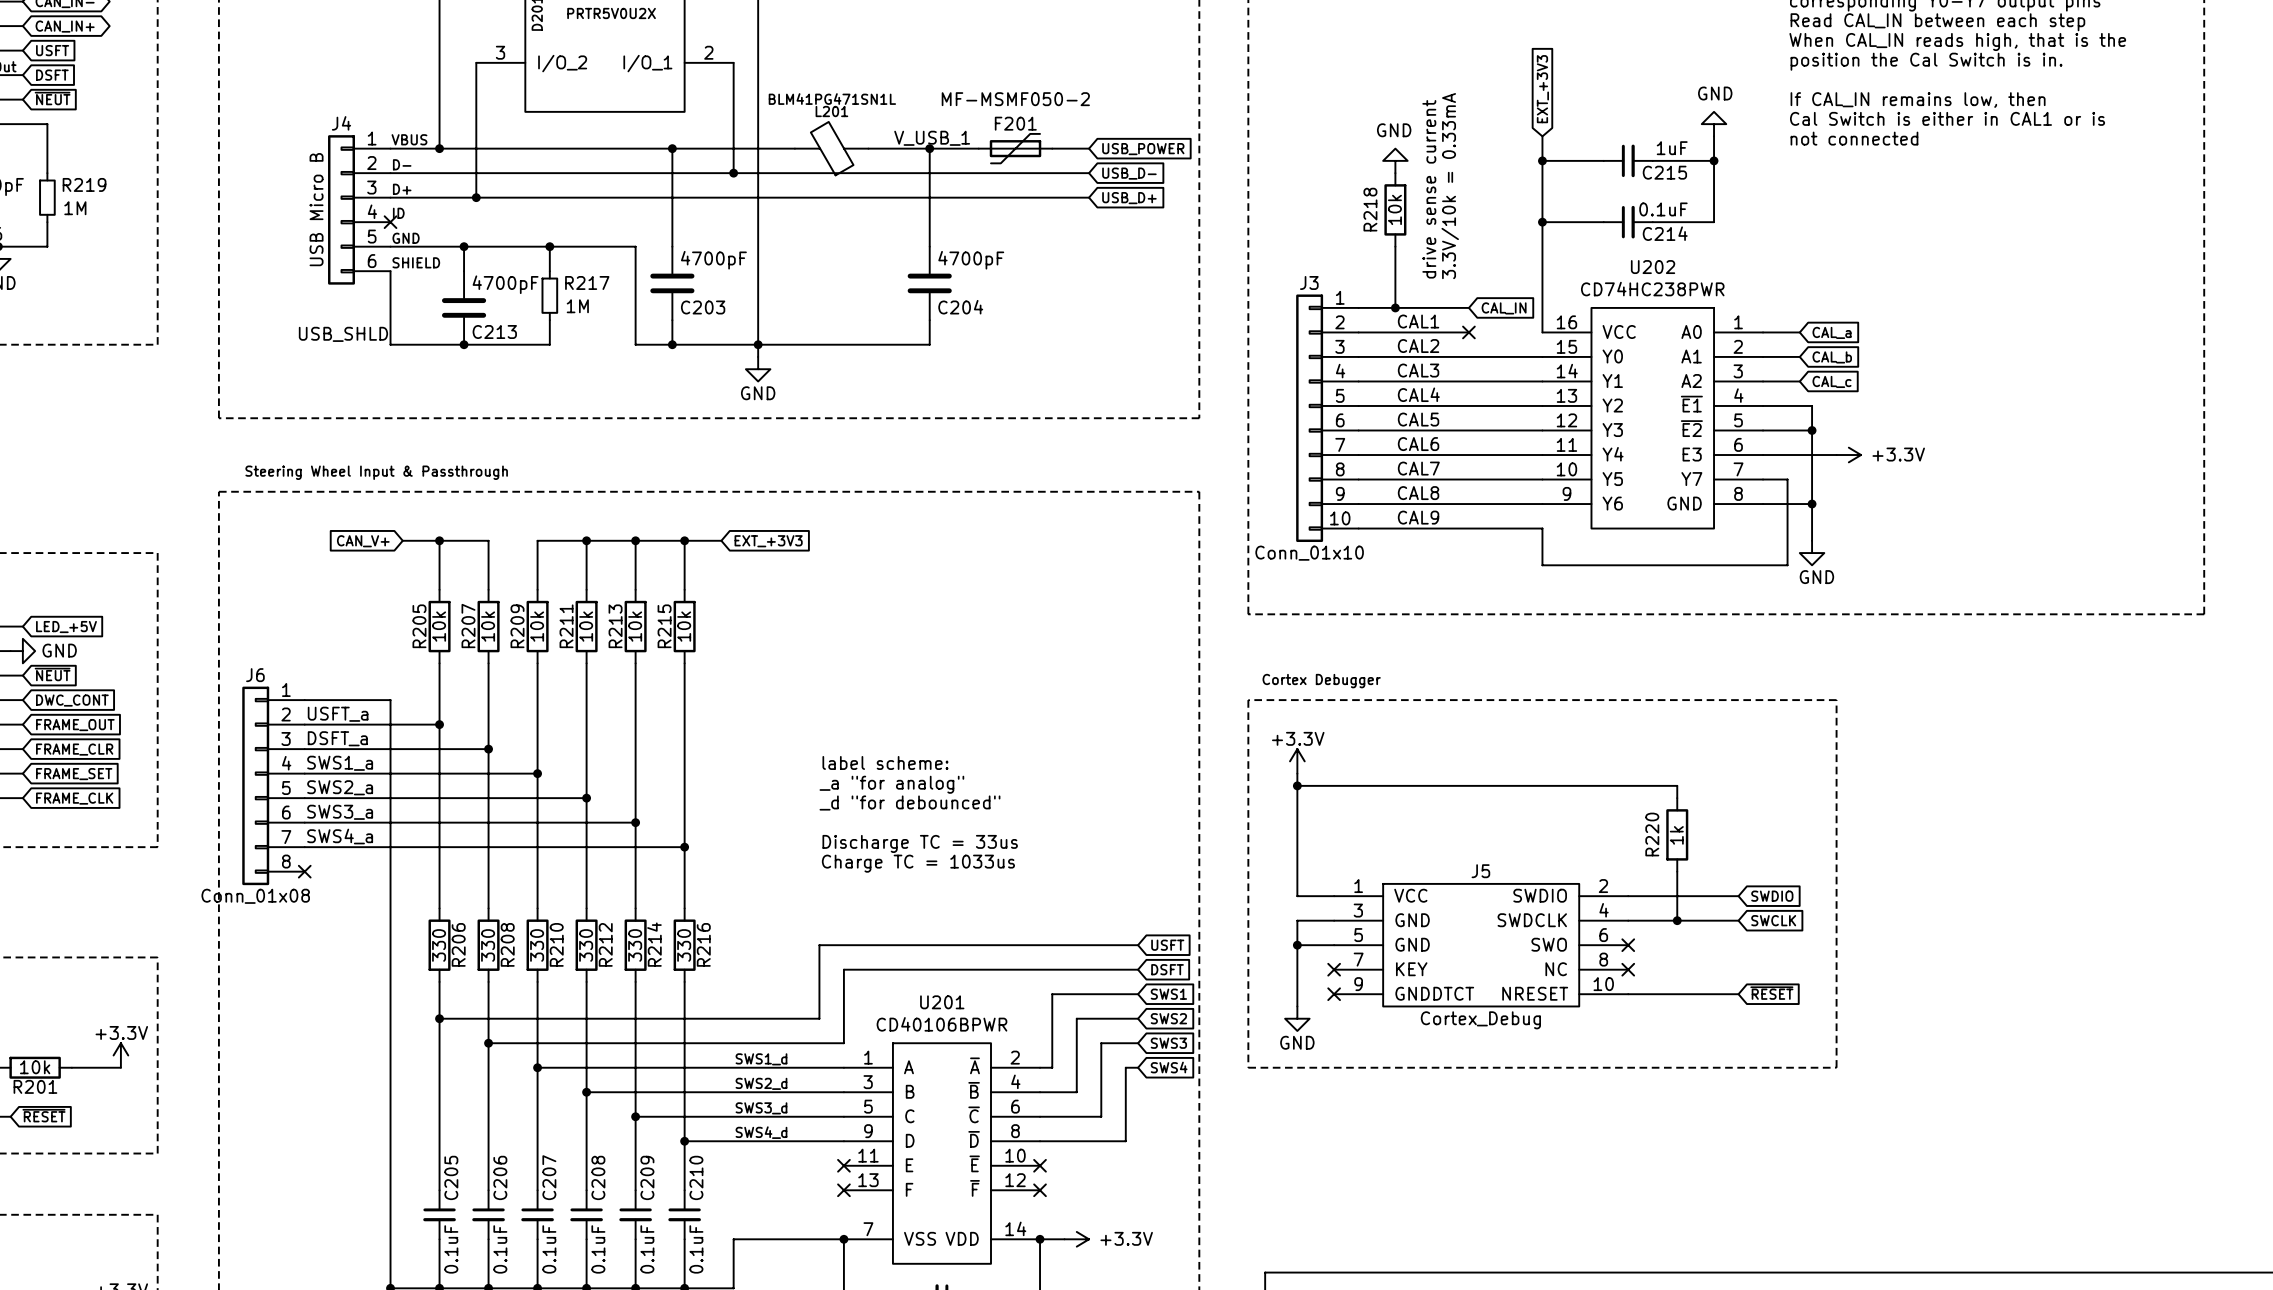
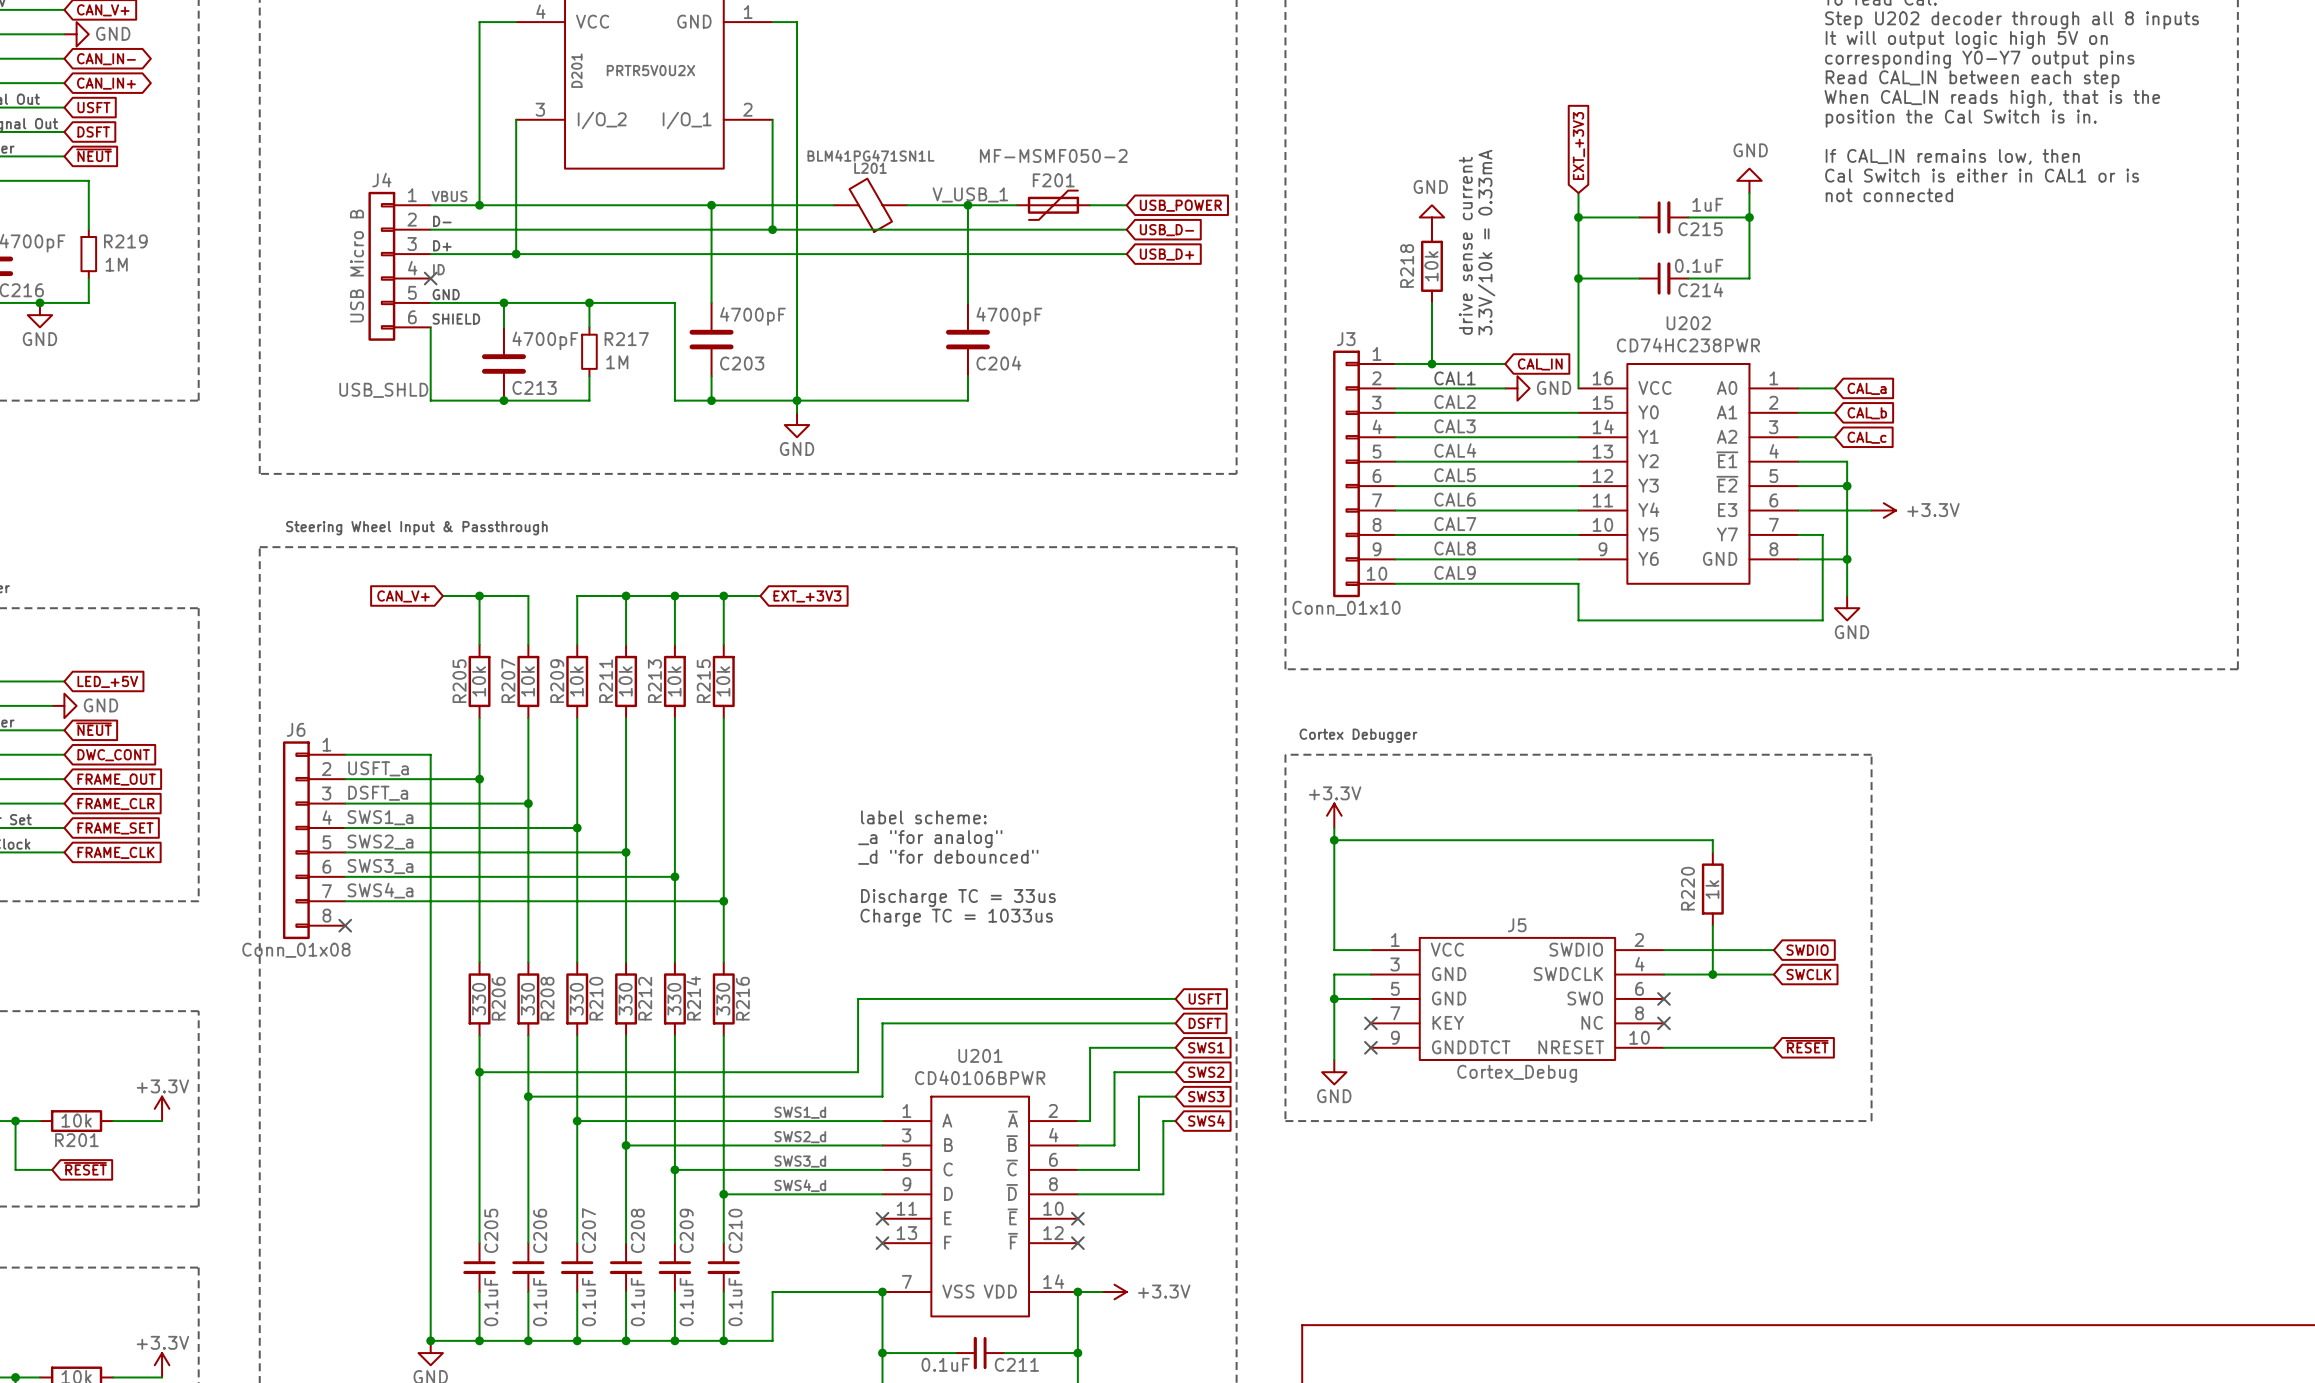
label: CAL1 (1418, 321) -> none
text: none -> CAL1 (1455, 378)
no-connect mark: (1468, 332) -> none
power symbol: none -> GND (1517, 388)

